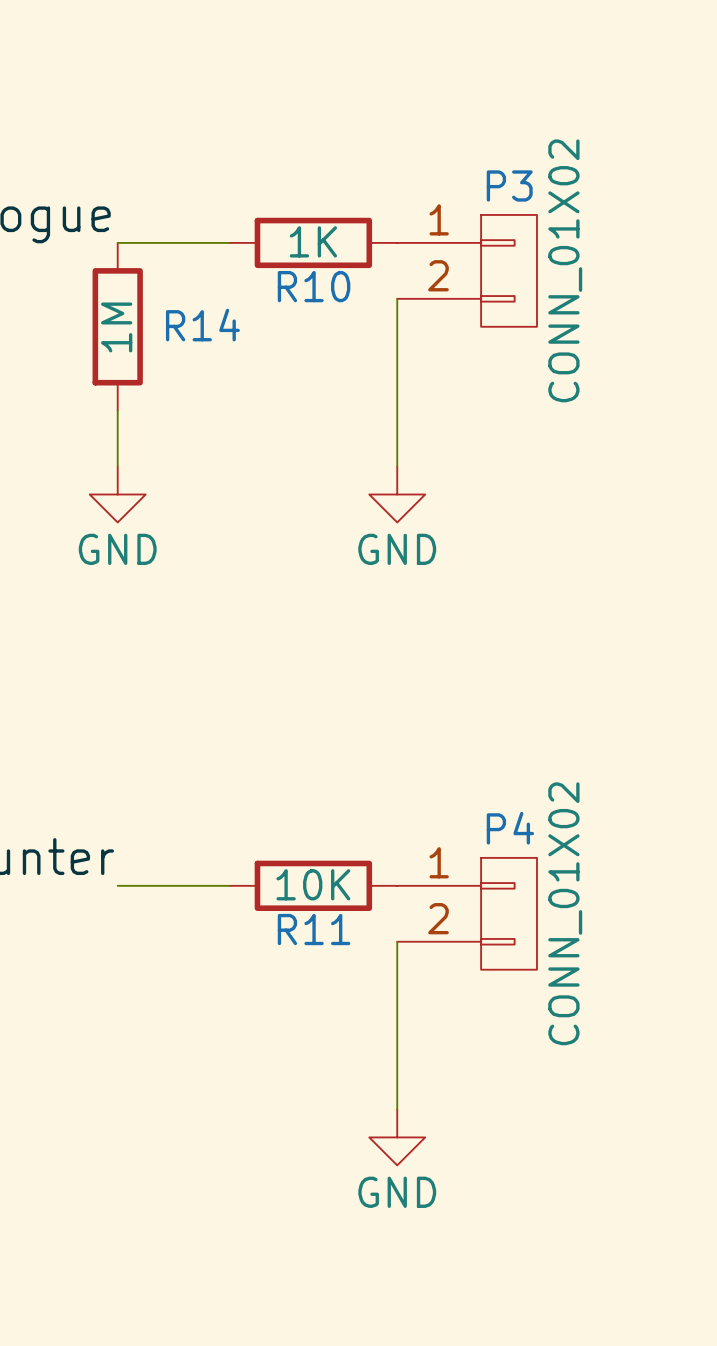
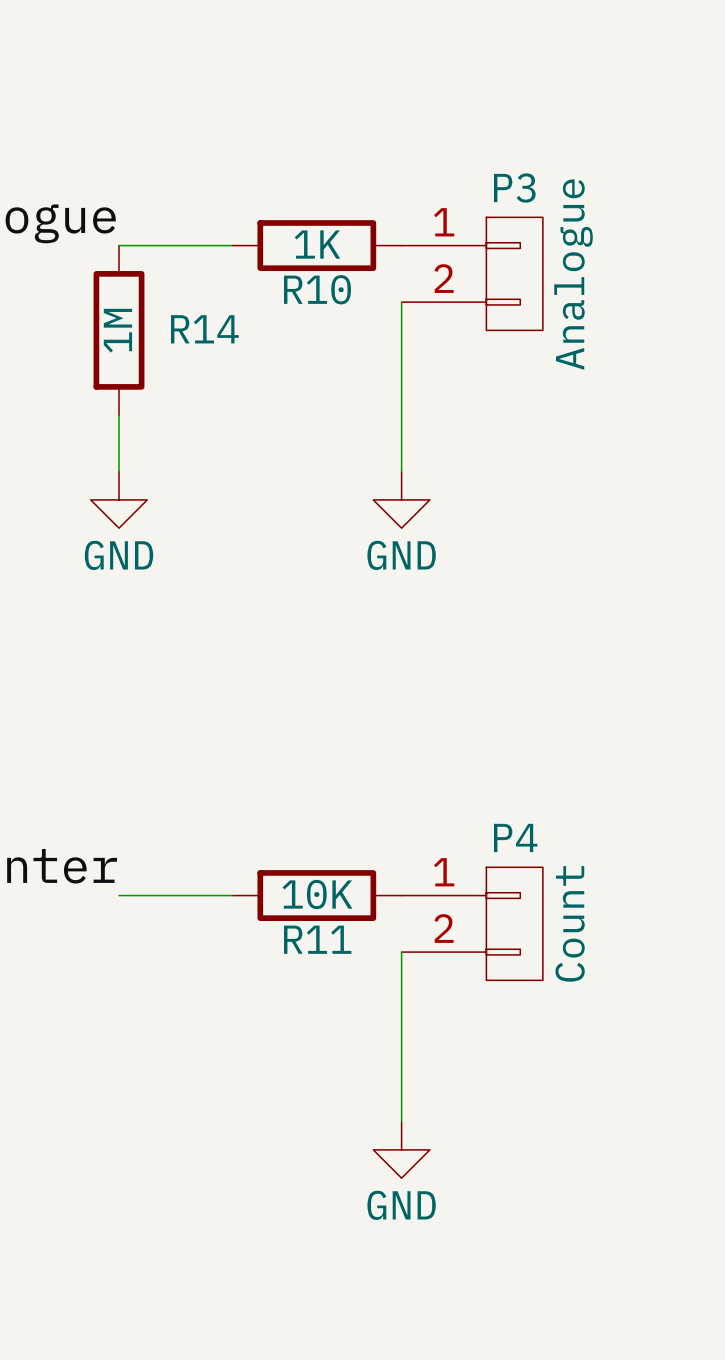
P3 value: CONN_01X02 (565, 270) -> Analogue (573, 274)
P4 value: CONN_01X02 (565, 913) -> Count (570, 923)

